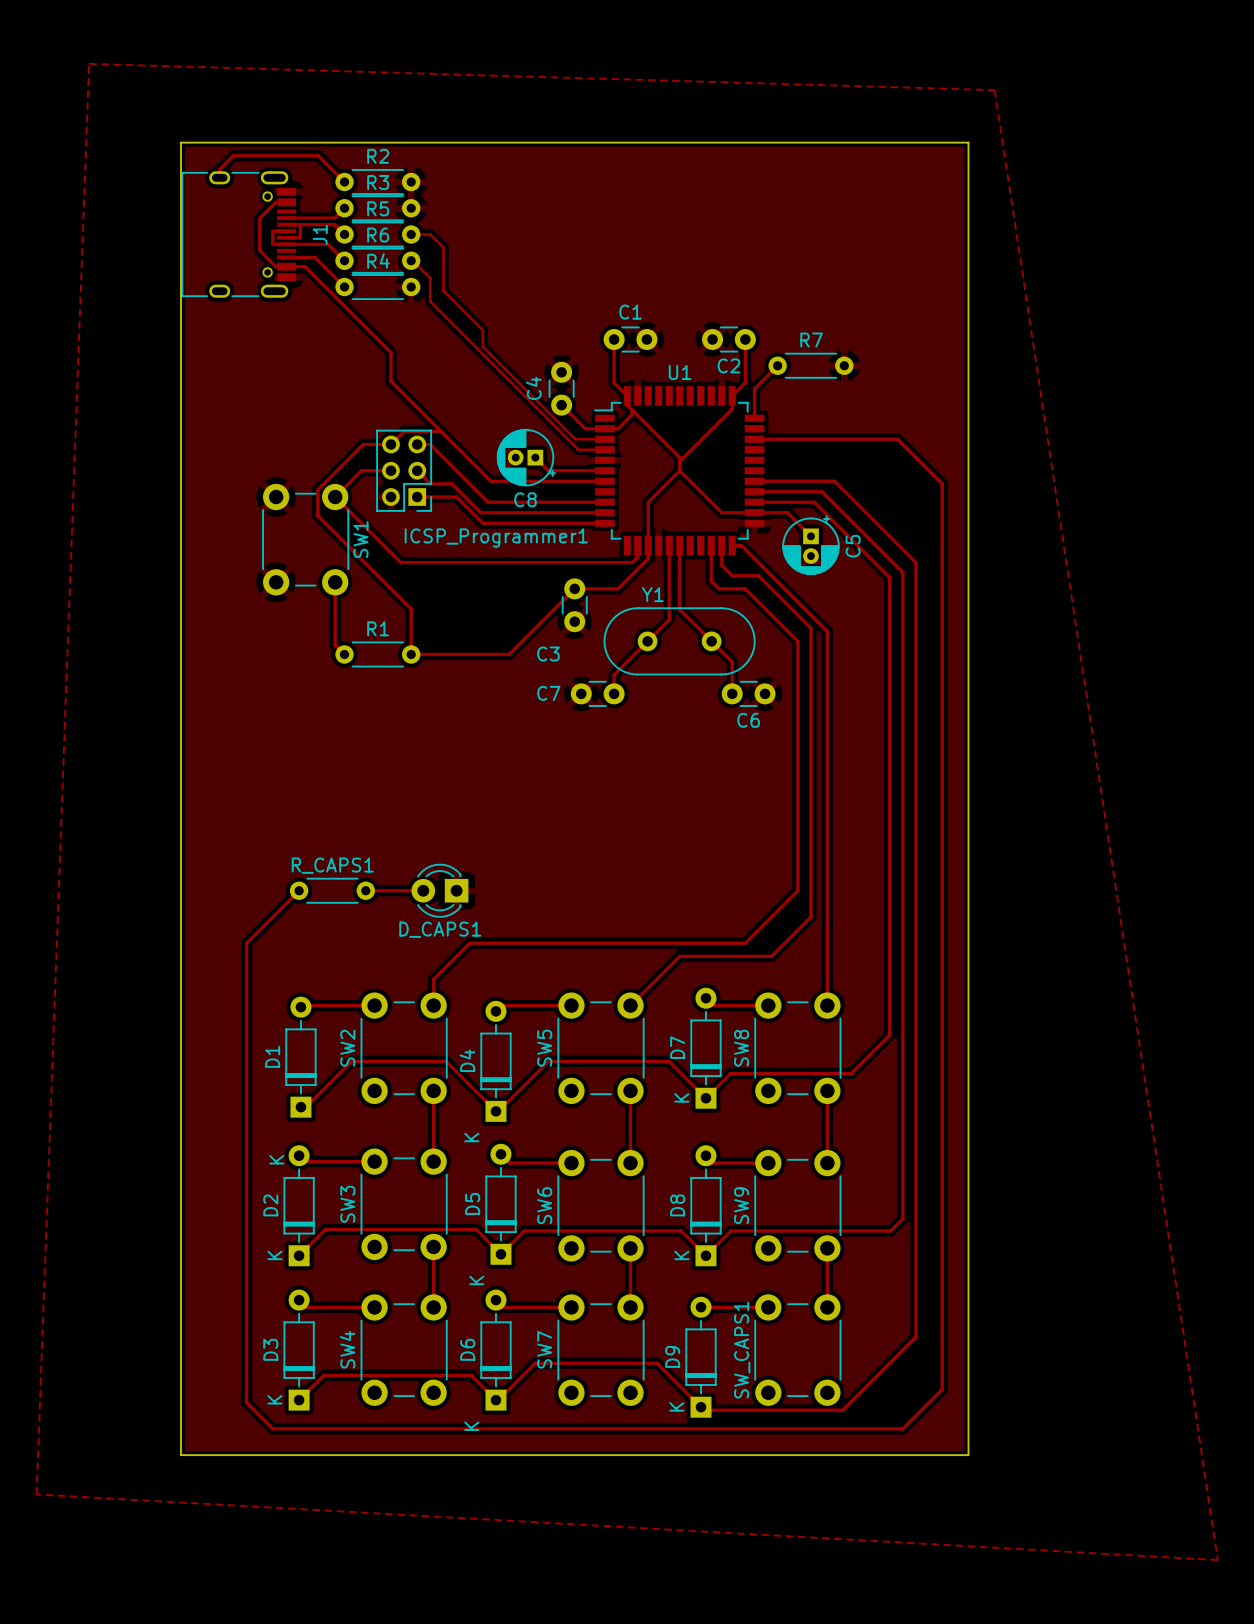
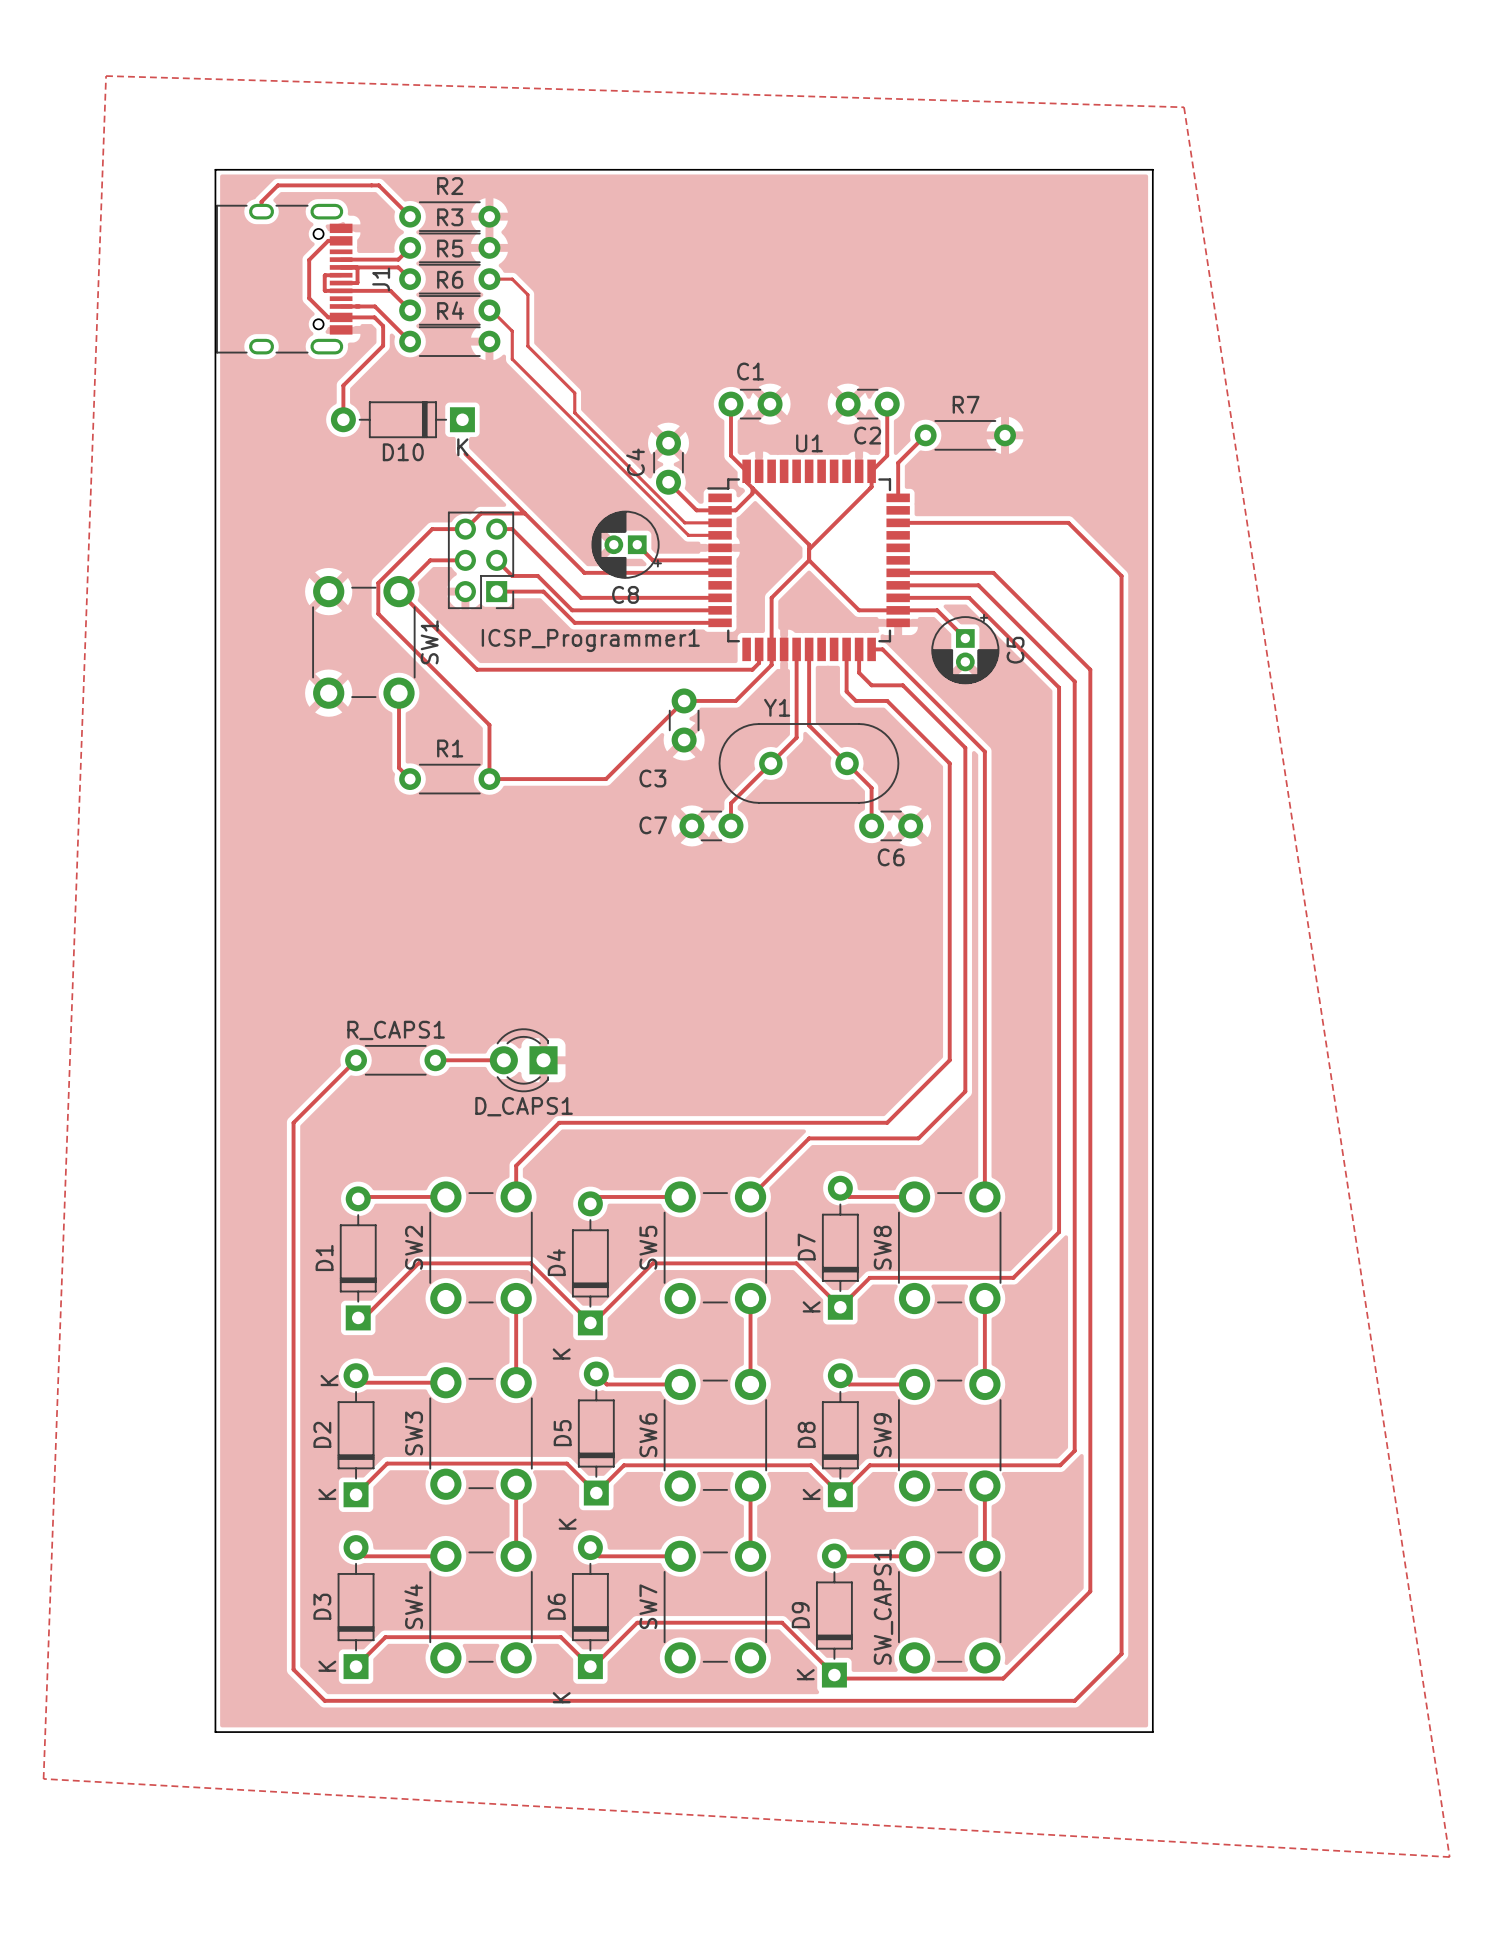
top track: (305, 266) (390, 352) (390, 381) -> (363, 317) (374, 317) (383, 326) (383, 345) (343, 385) (343, 419)
D10: none -> (402, 419)

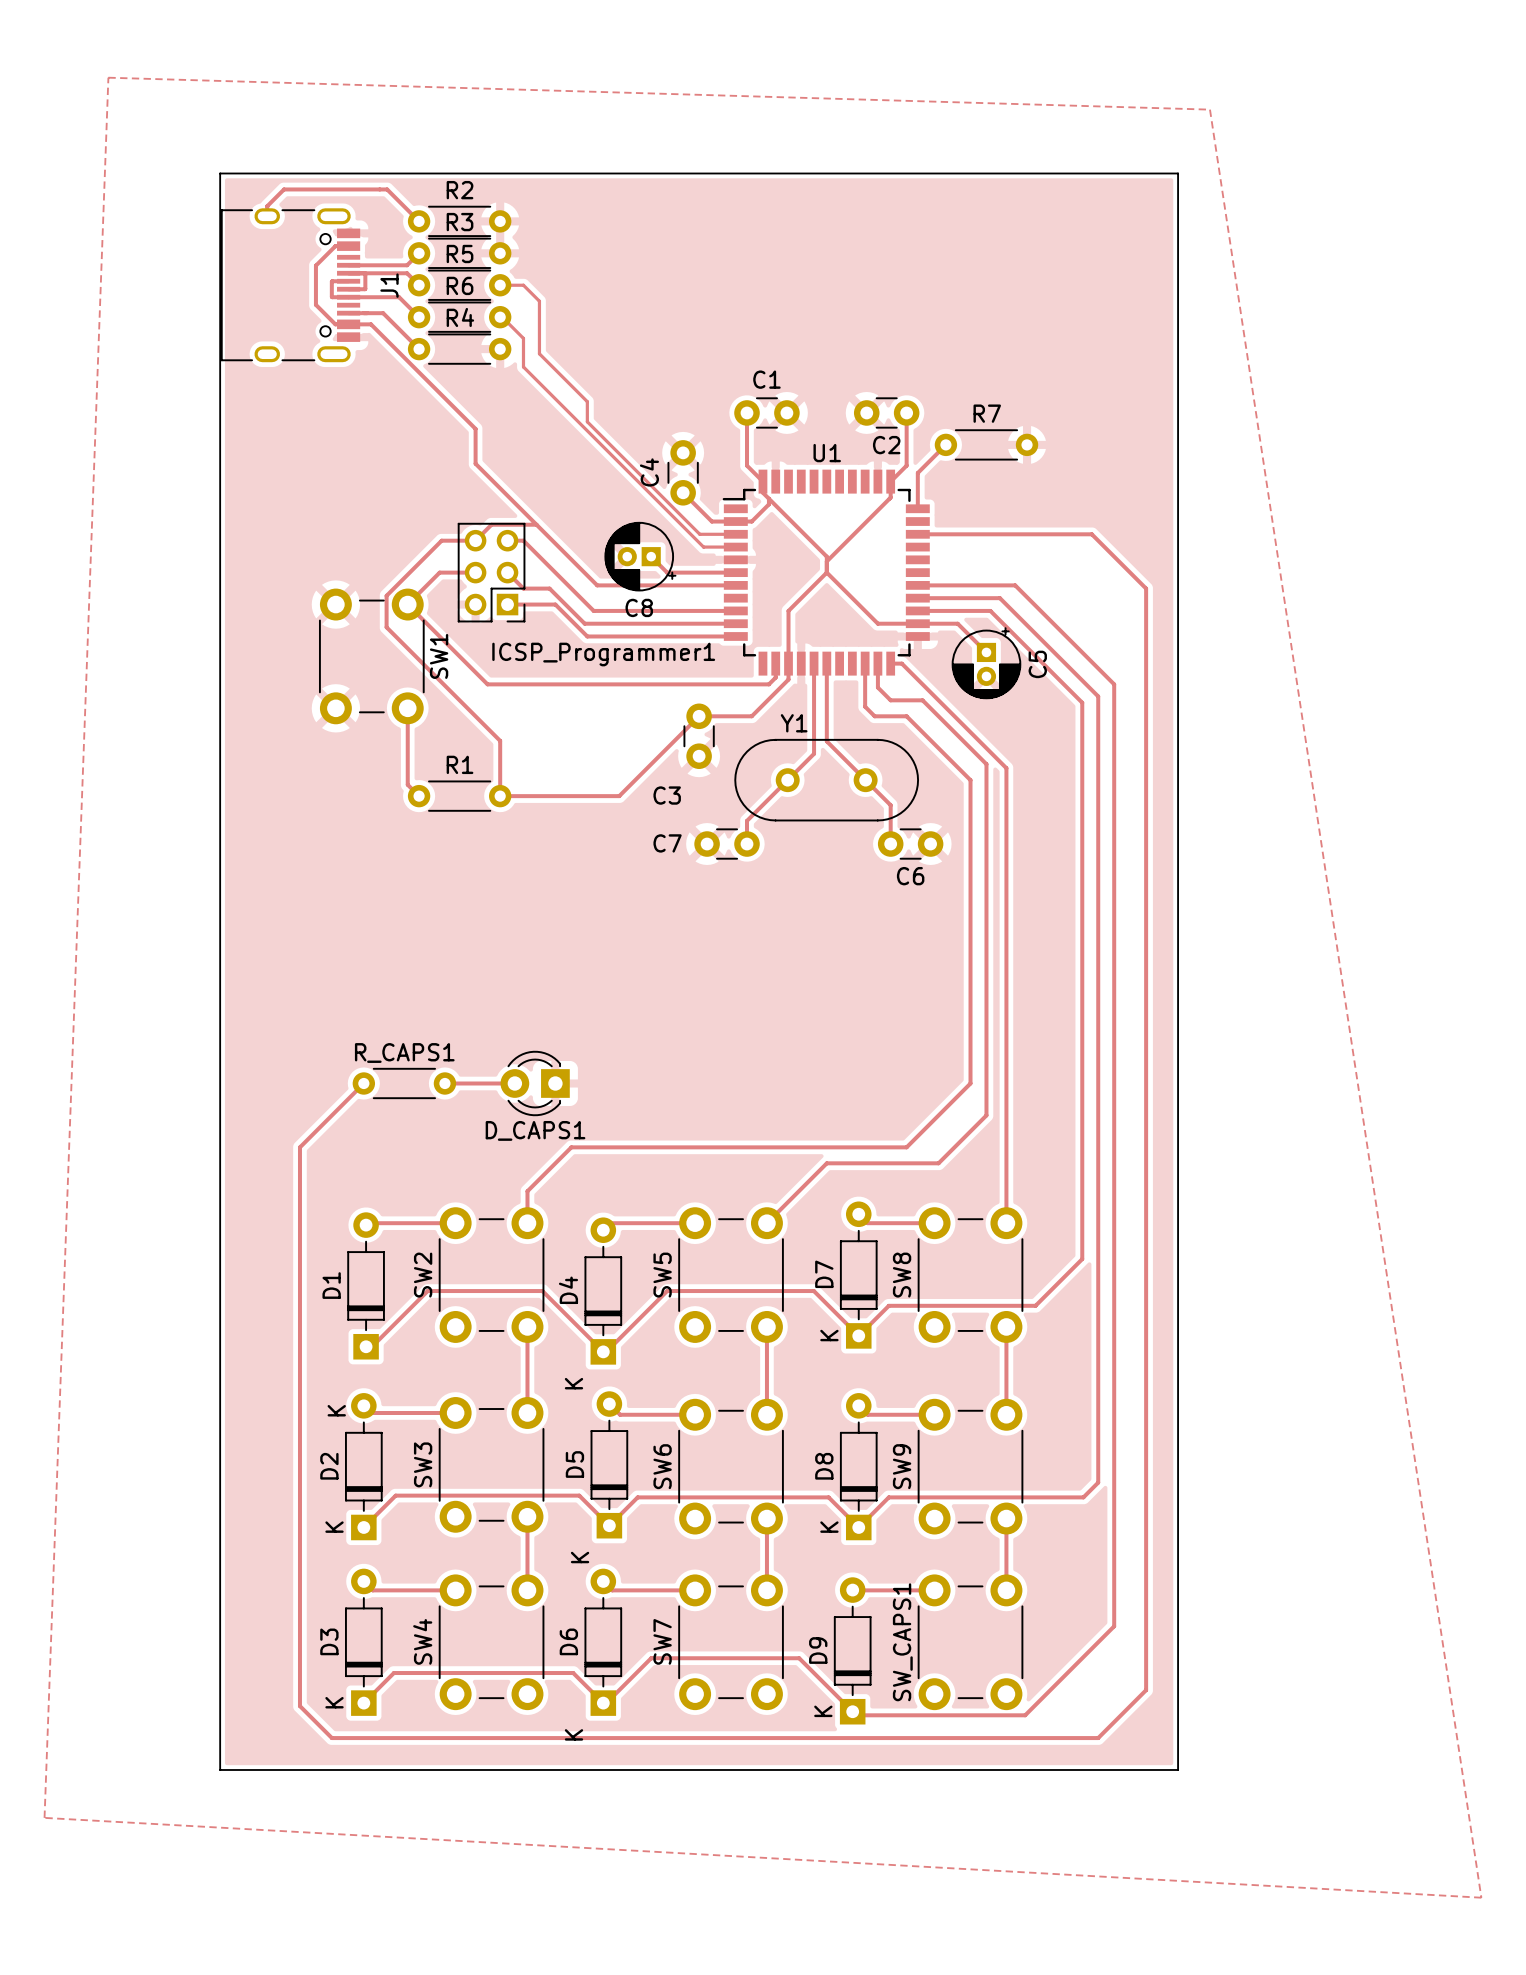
top track: (363, 317) (374, 317) (383, 326) (383, 345) (343, 385) (343, 419) -> (371, 324) (475, 428) (475, 463)
D10: (402, 419) -> none

